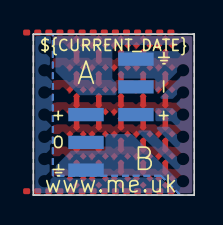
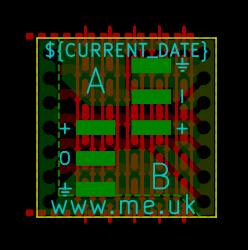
top track: none -> (85, 26) (85, 42)
top track: none -> (109, 26) (109, 42)
top track: none -> (134, 26) (134, 42)
top track: none -> (159, 26) (159, 42)
top track: none -> (184, 26) (184, 42)
top track: none -> (77, 36) (77, 212)
top track: none -> (92, 36) (92, 212)
top track: none -> (102, 36) (102, 212)
top track: none -> (117, 36) (117, 212)
top track: none -> (127, 36) (127, 212)
top track: none -> (142, 36) (142, 212)
top track: none -> (151, 36) (151, 212)
top track: none -> (166, 36) (166, 212)
top track: none -> (176, 36) (176, 212)
top track: none -> (191, 36) (191, 212)
top track: none -> (85, 205) (85, 222)
top track: none -> (109, 205) (109, 222)
top track: none -> (134, 205) (134, 222)
top track: none -> (159, 205) (159, 222)
top track: none -> (184, 205) (184, 222)

